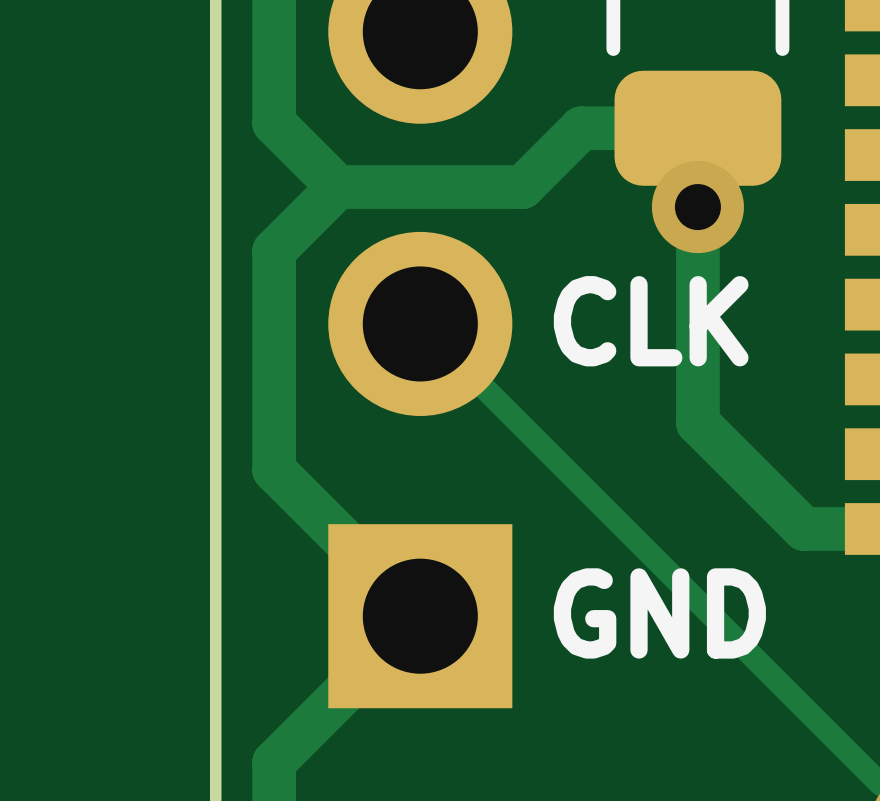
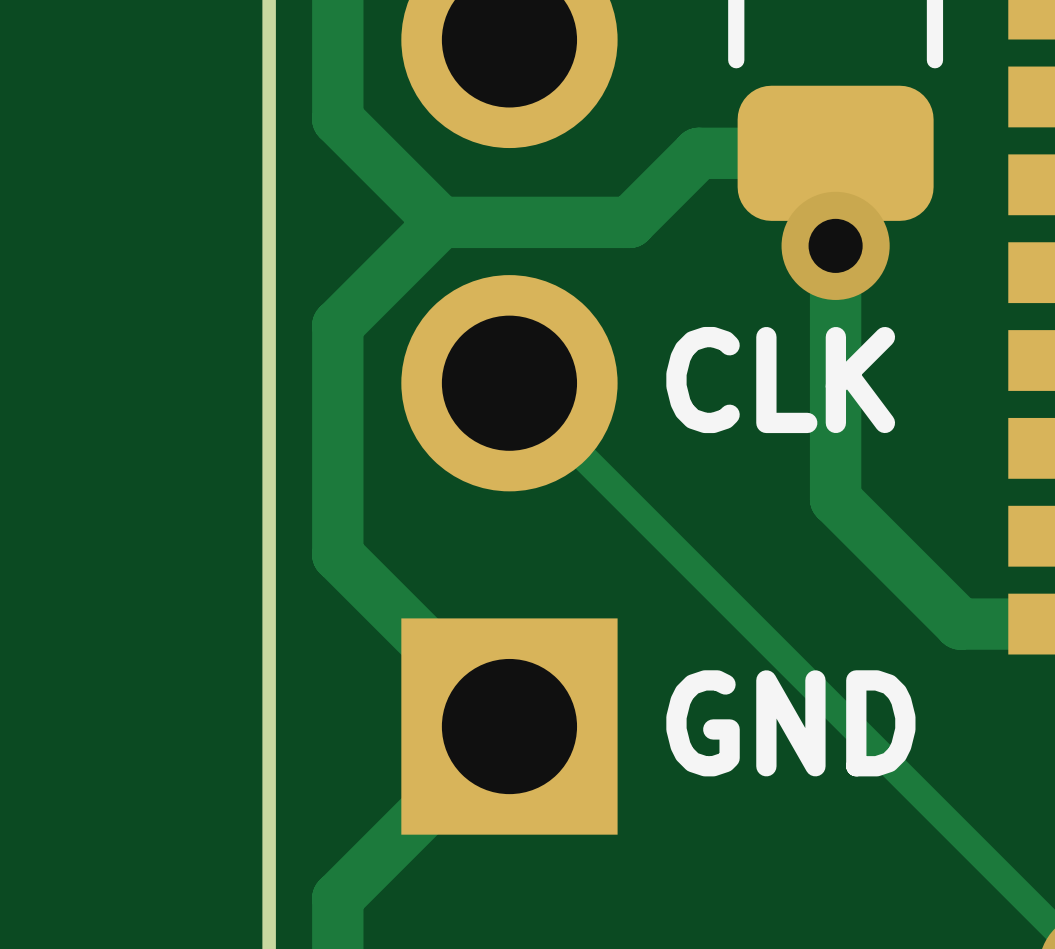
track: (274, 99) (274, 123) (338, 187) -> (337, 119) (440, 222) (337, 325)
track: (338, 187) (274, 250) (274, 274) -> none

